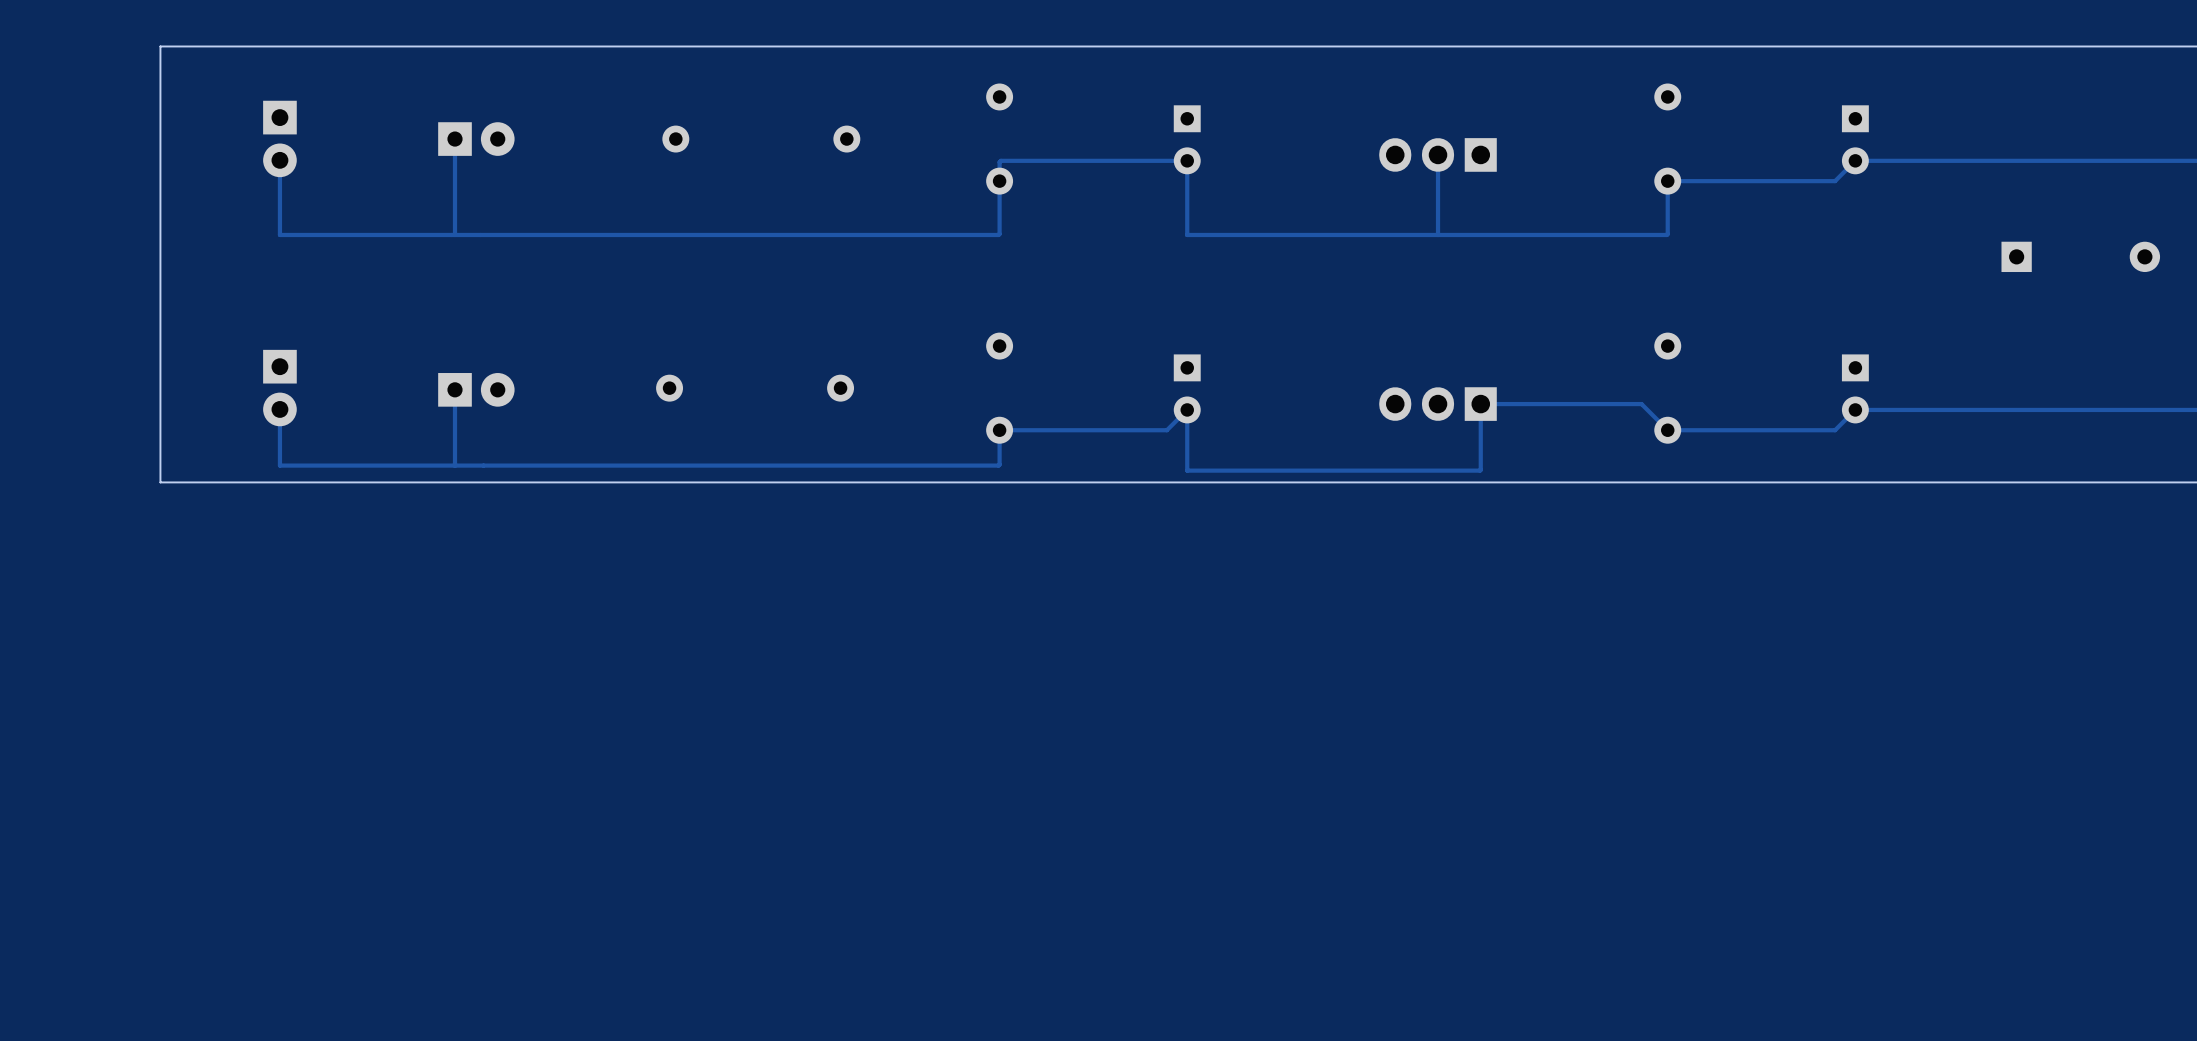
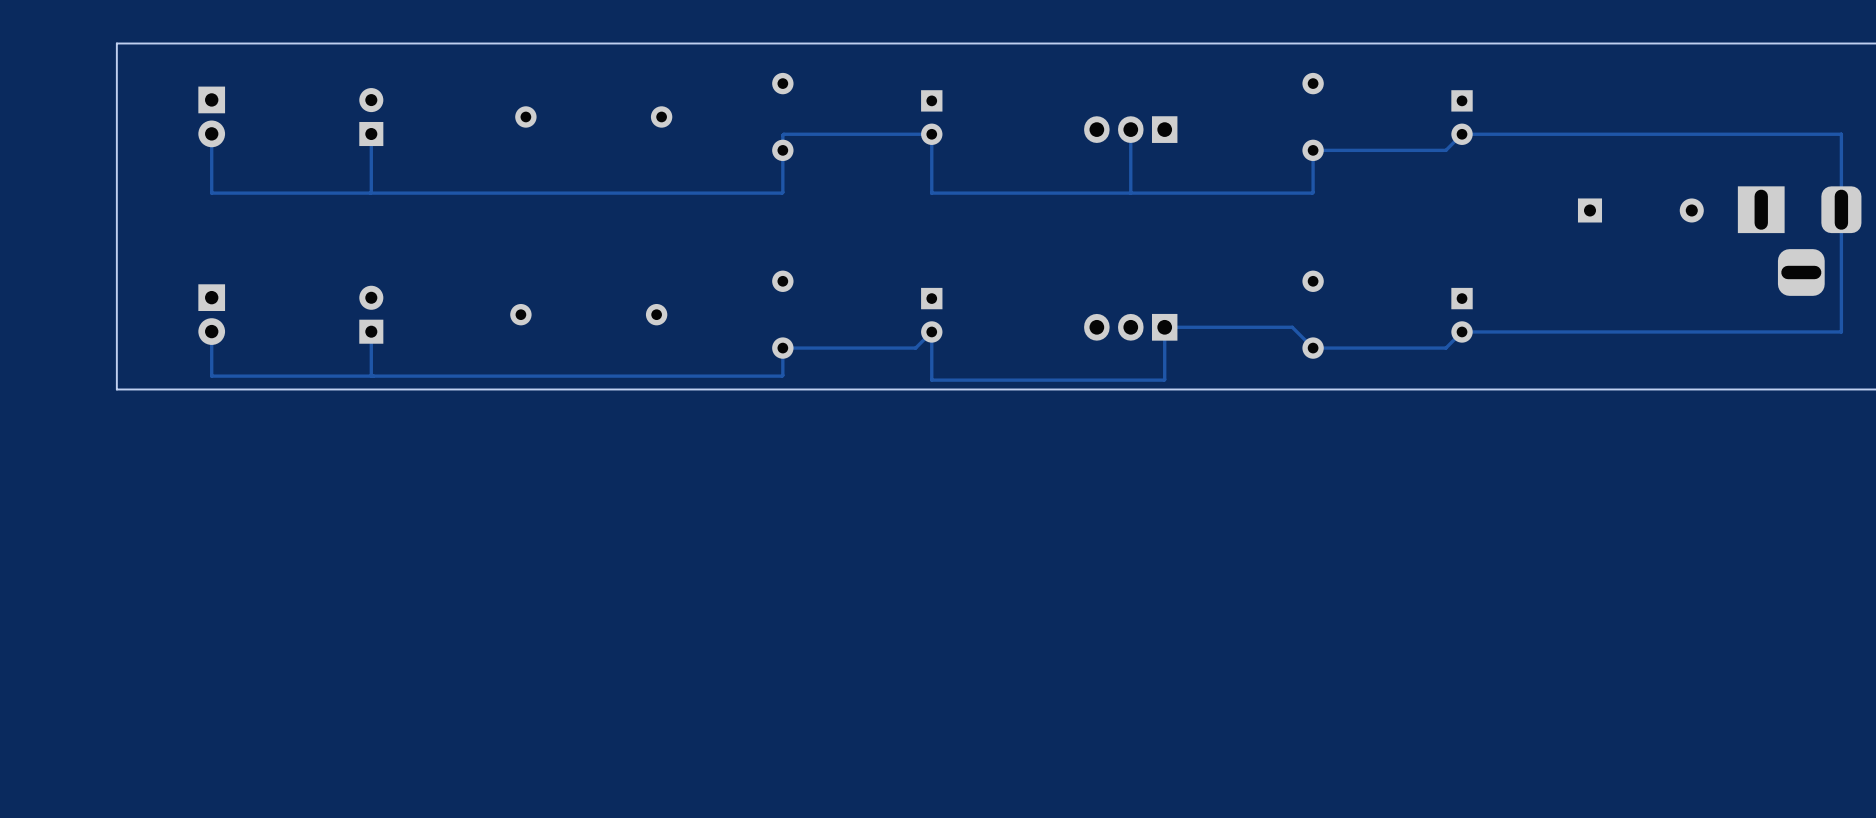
part footprint: [438, 122, 515, 156] -> [359, 88, 384, 147]
track: (454, 139) (454, 234) -> none
track: none -> (371, 134) (370, 193)
part footprint: [438, 373, 515, 407] -> [359, 285, 384, 344]
track: (454, 389) (454, 465) -> none
track: none -> (371, 331) (371, 376)

